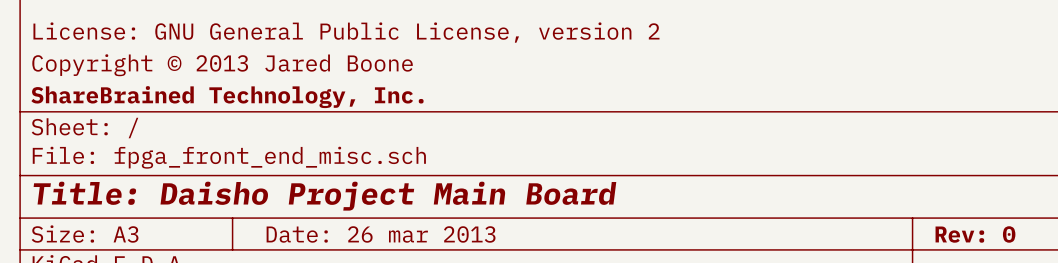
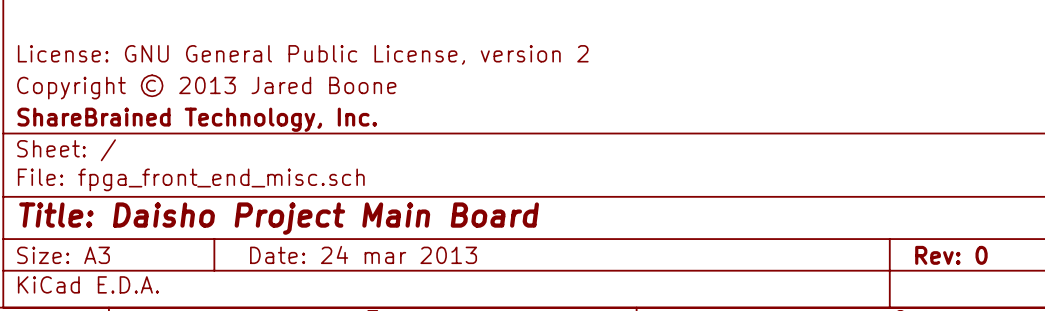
title block: Date: 26 mar 2013 (381, 234) -> Date: 24 mar 2013 (363, 254)

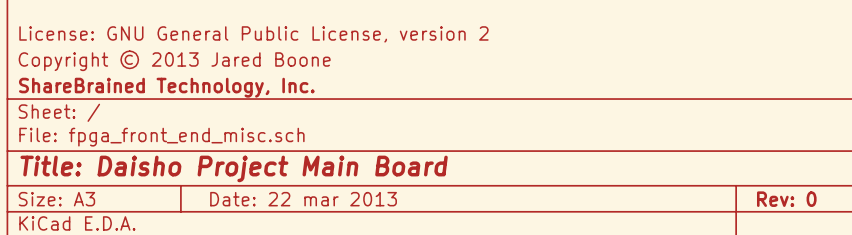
title block: Date: 24 mar 2013 (363, 254) -> Date: 22 mar 2013 (303, 199)

